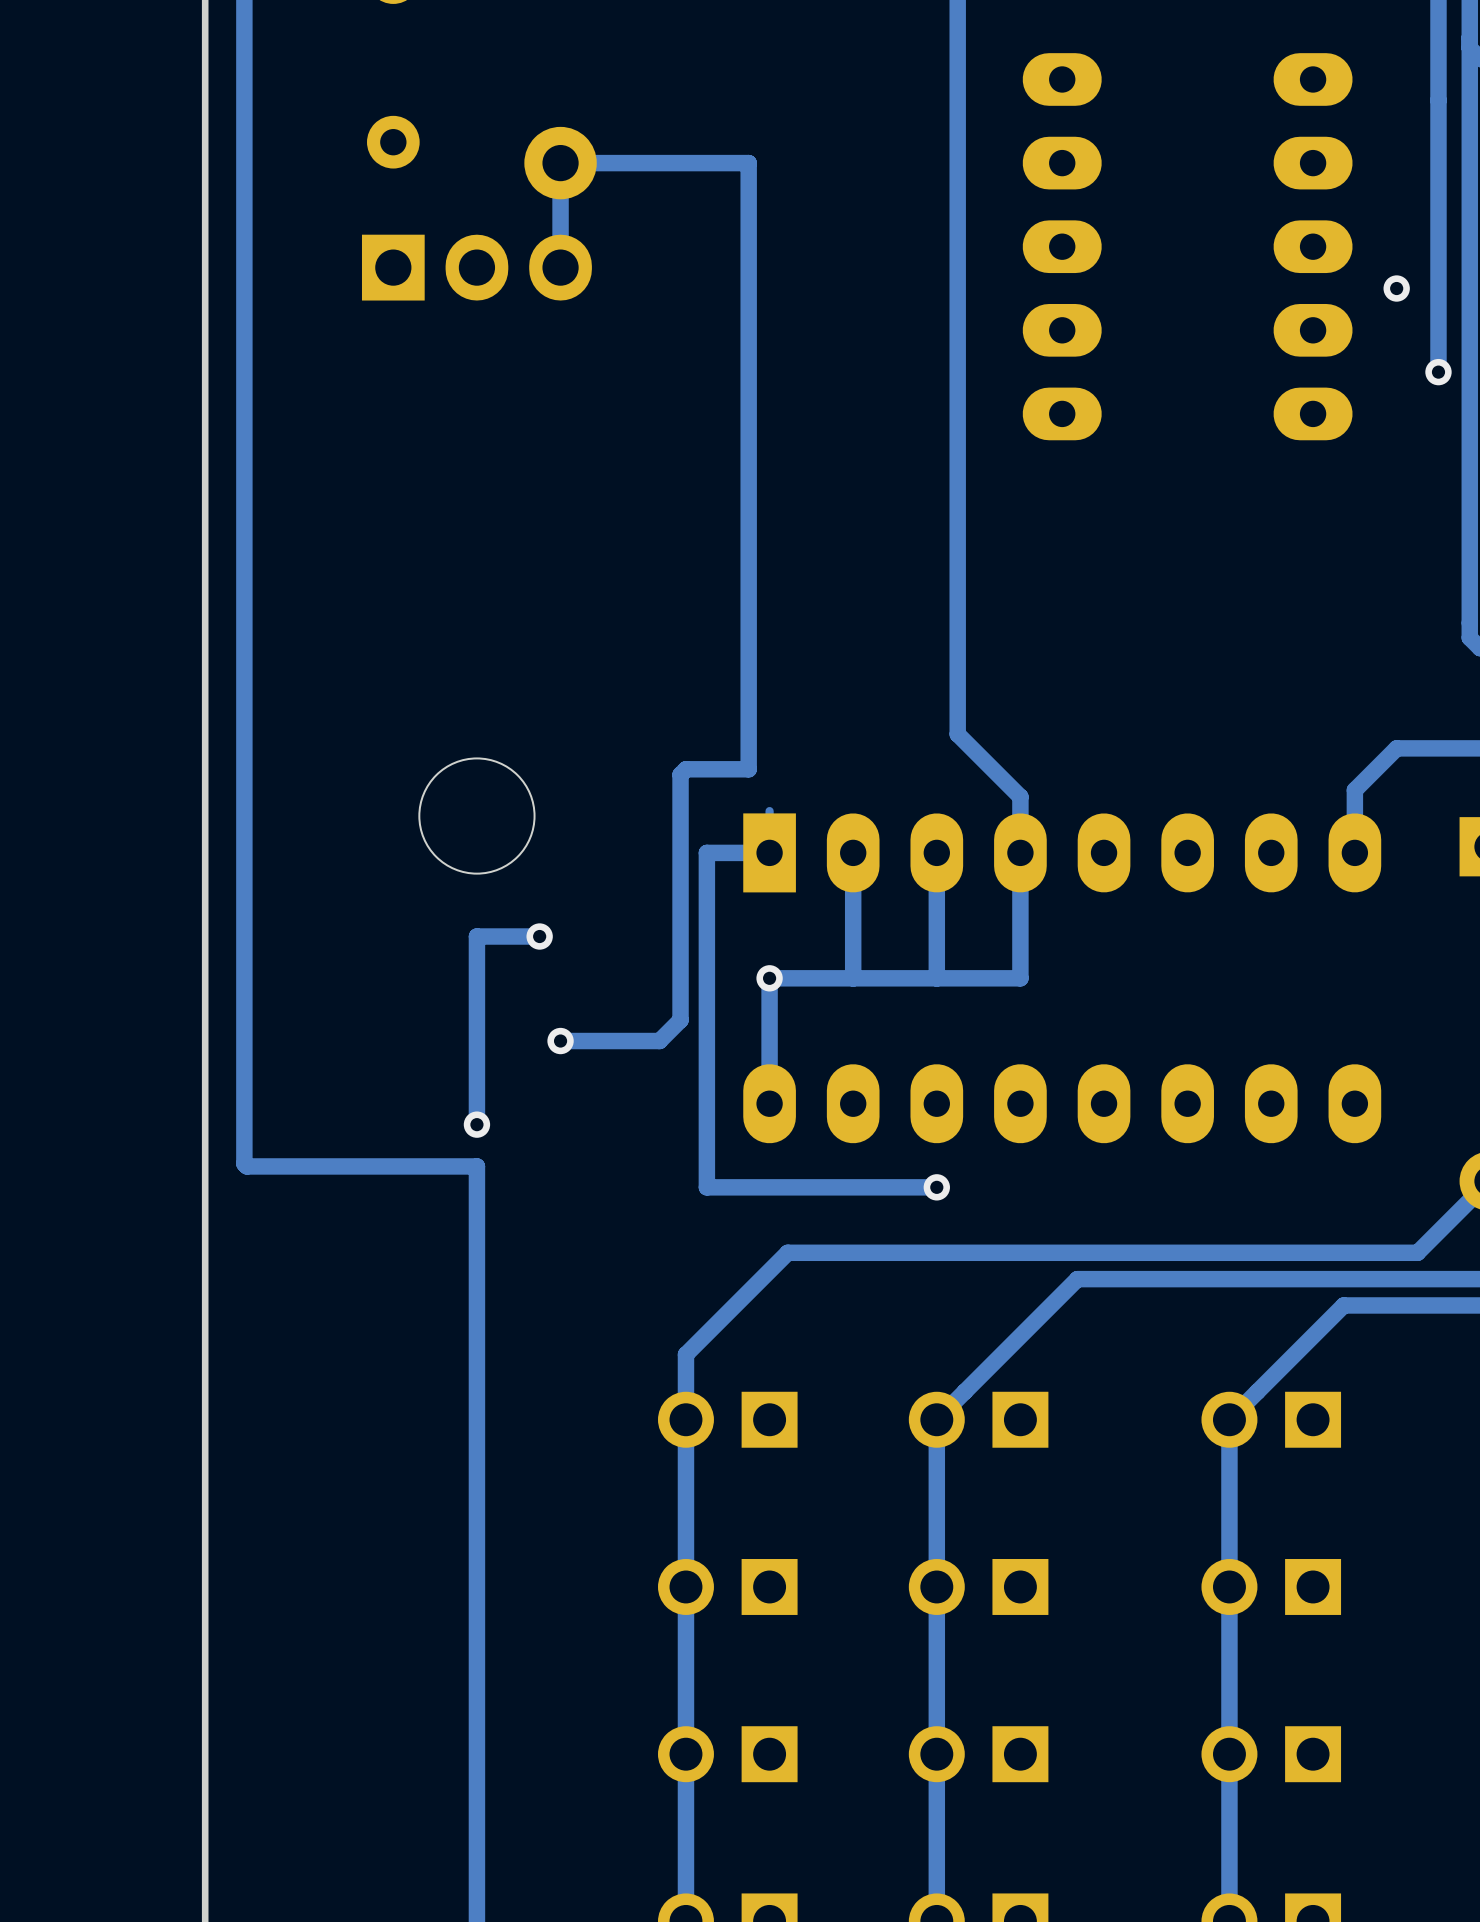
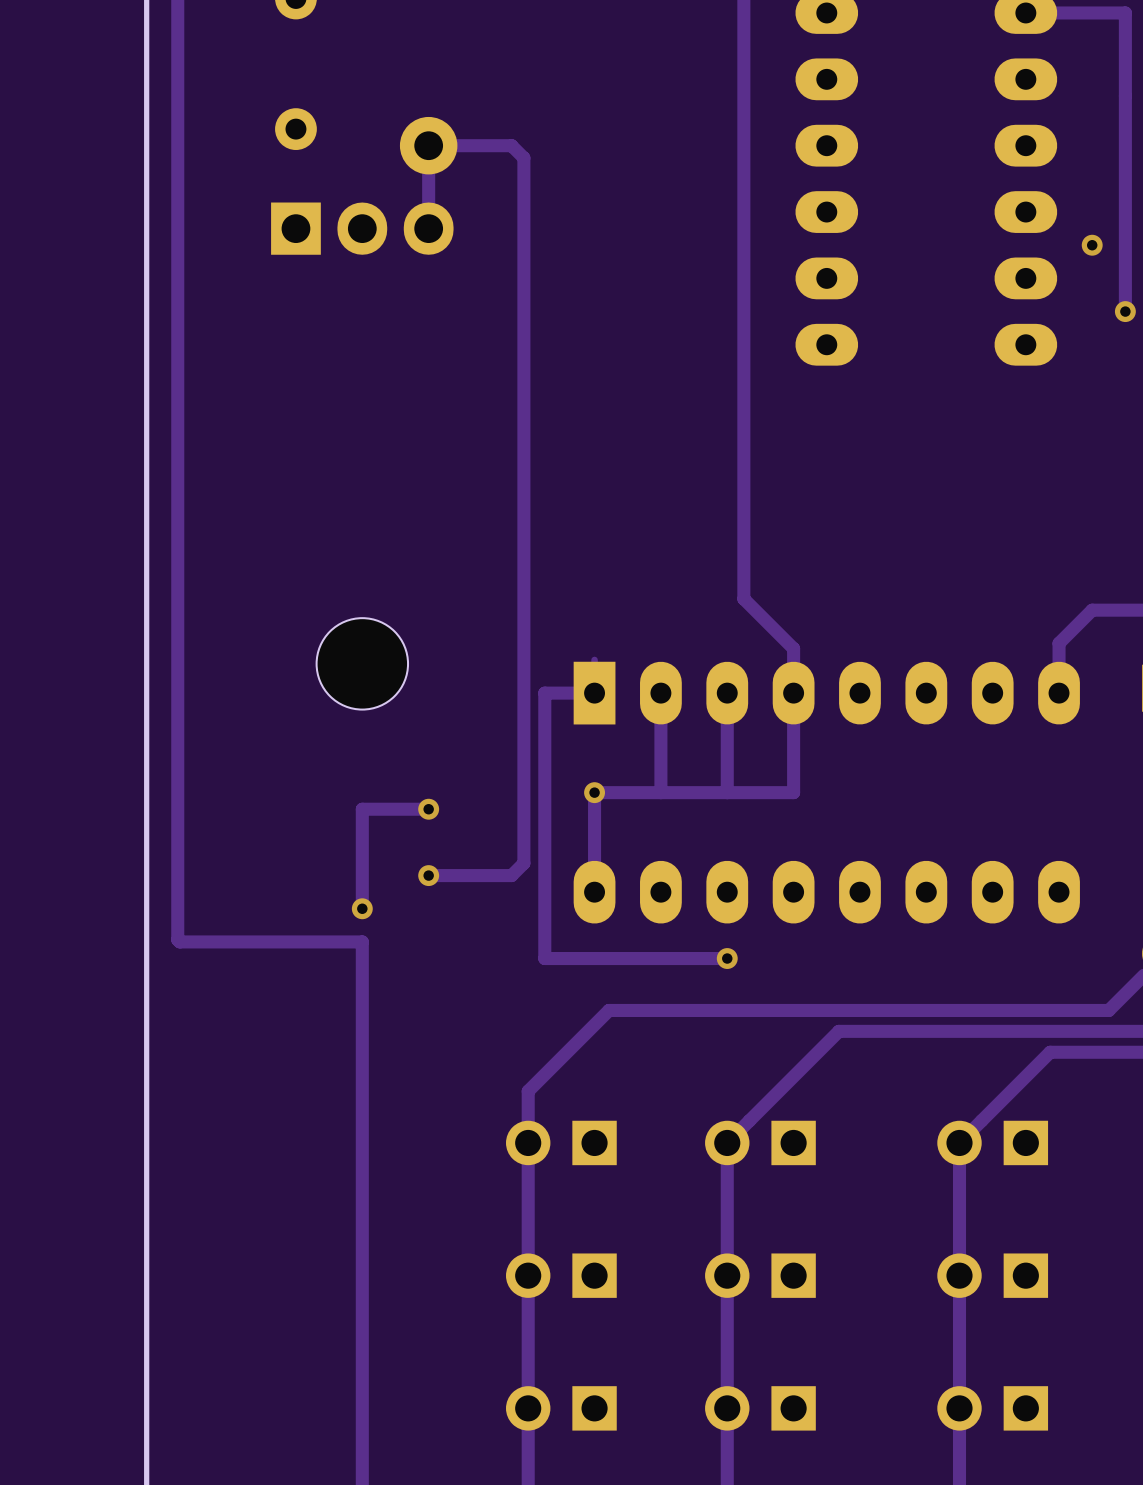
track: (665, 163) (748, 163) (748, 769) (685, 769) (680, 774) -> (511, 145) (523, 157) (523, 631)
track: (539, 936) (476, 936) (476, 999) -> (428, 809) (362, 809)
via: (539, 936) -> none
via: none -> (428, 809)
track: (680, 1020) (659, 1041) (560, 1041) -> (523, 825) (523, 863) (511, 875) (428, 875)
via: (560, 1041) -> none
via: none -> (428, 875)

